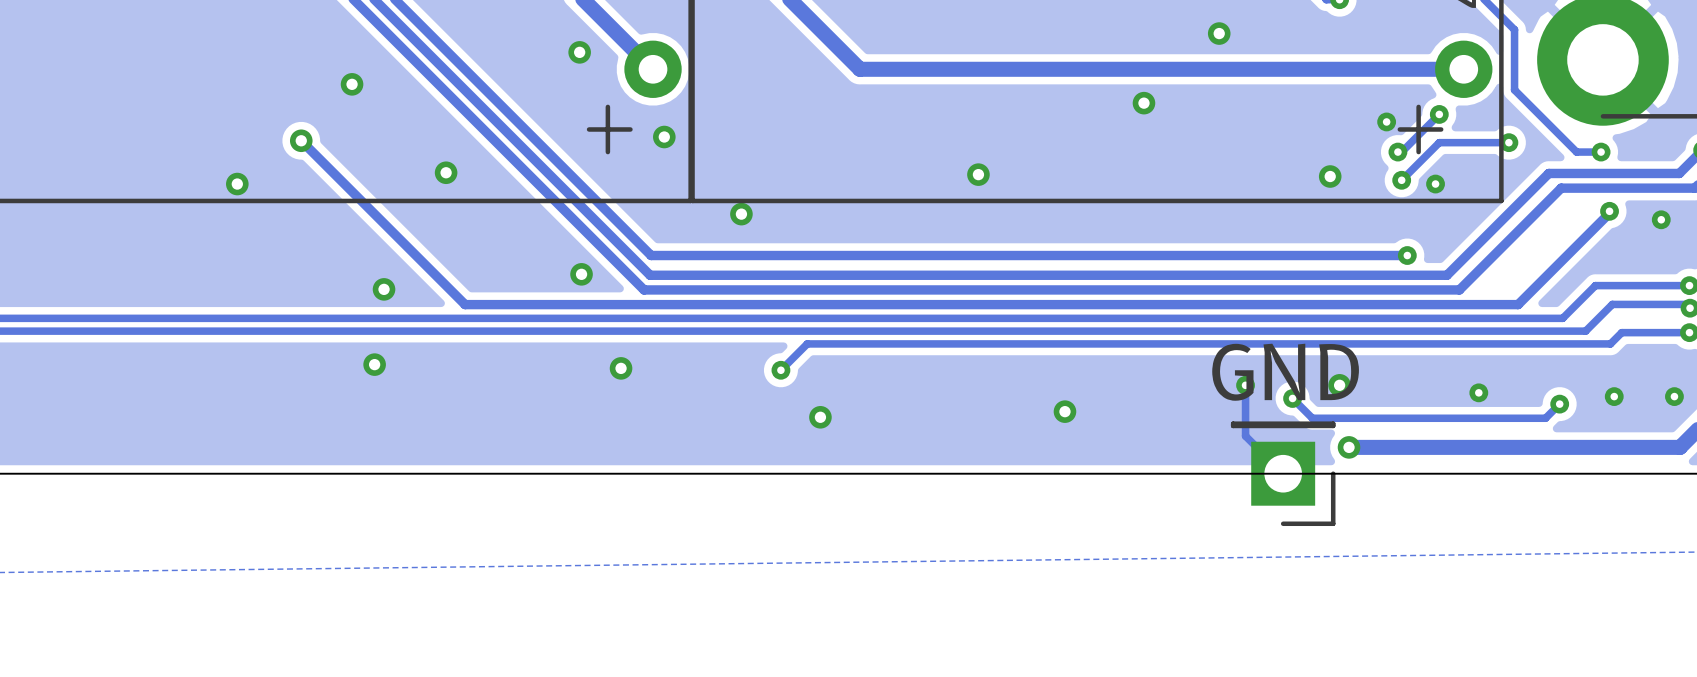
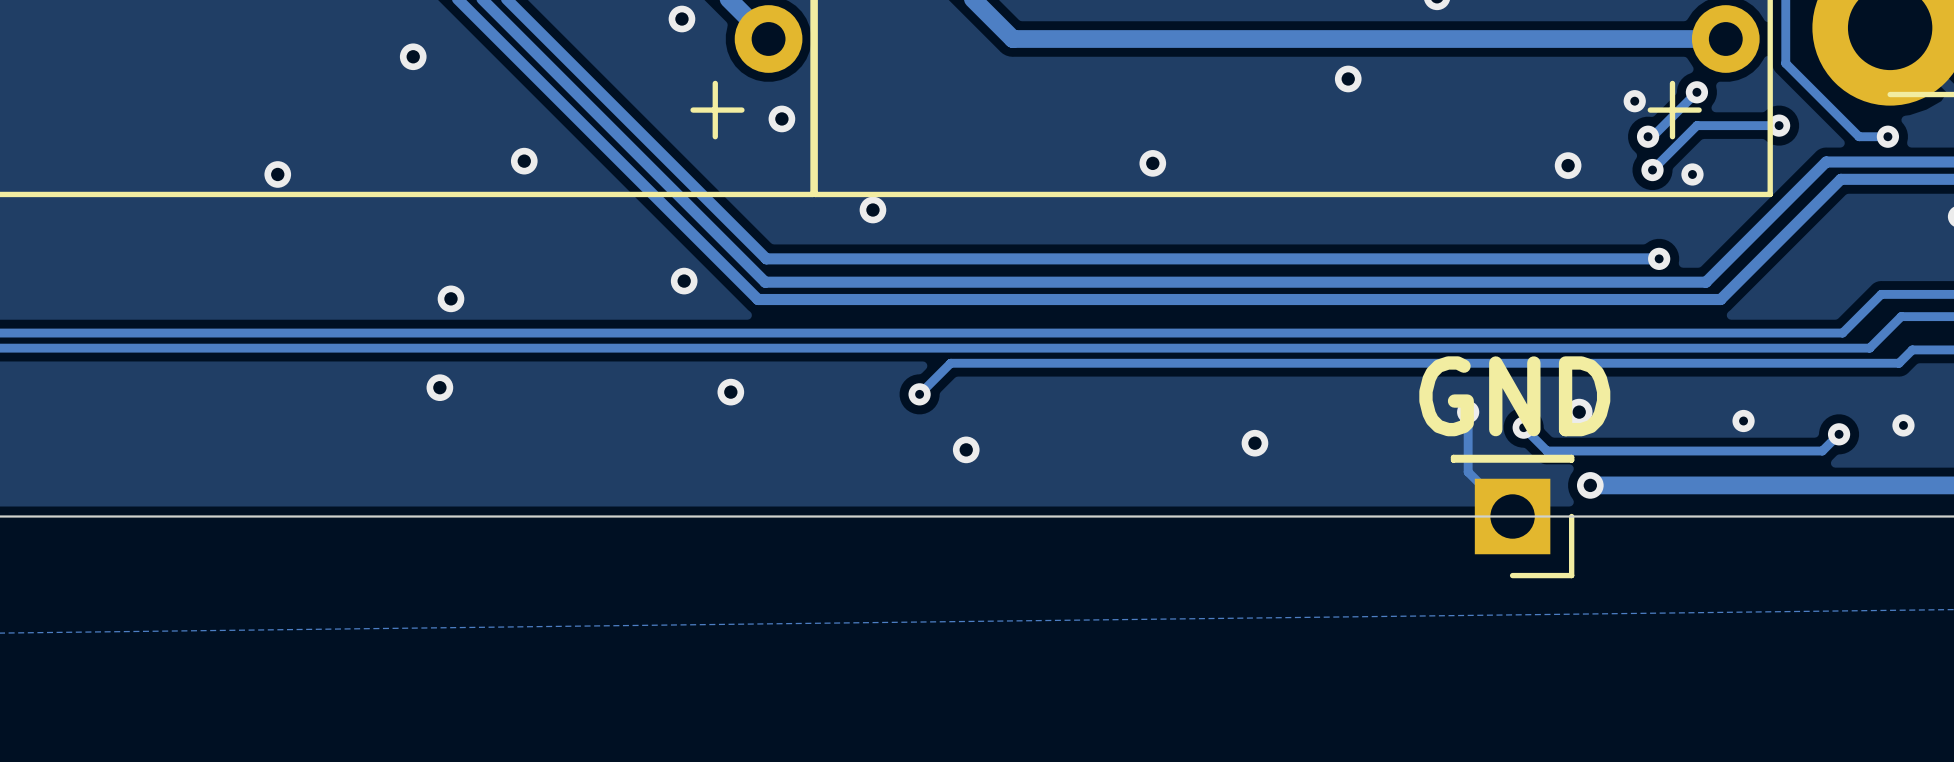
track: (301, 140) (465, 304) (1518, 304) (1611, 211) -> none
via: (301, 140) -> none
via: (1609, 211) -> none

